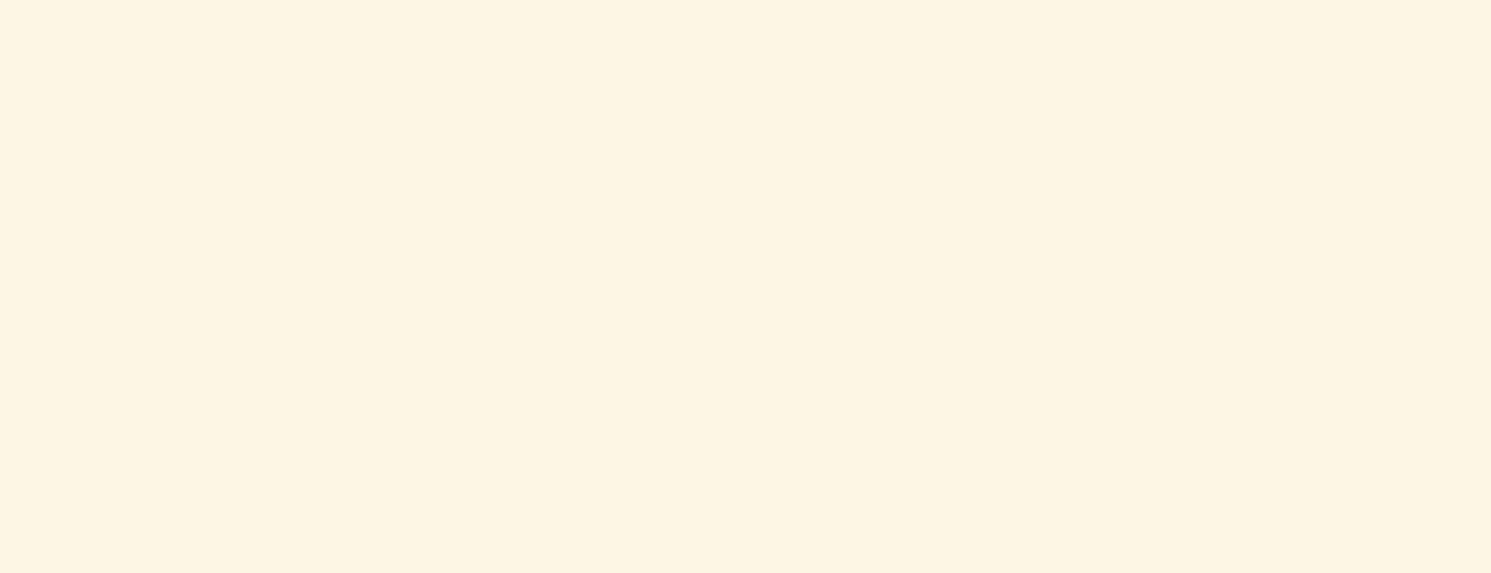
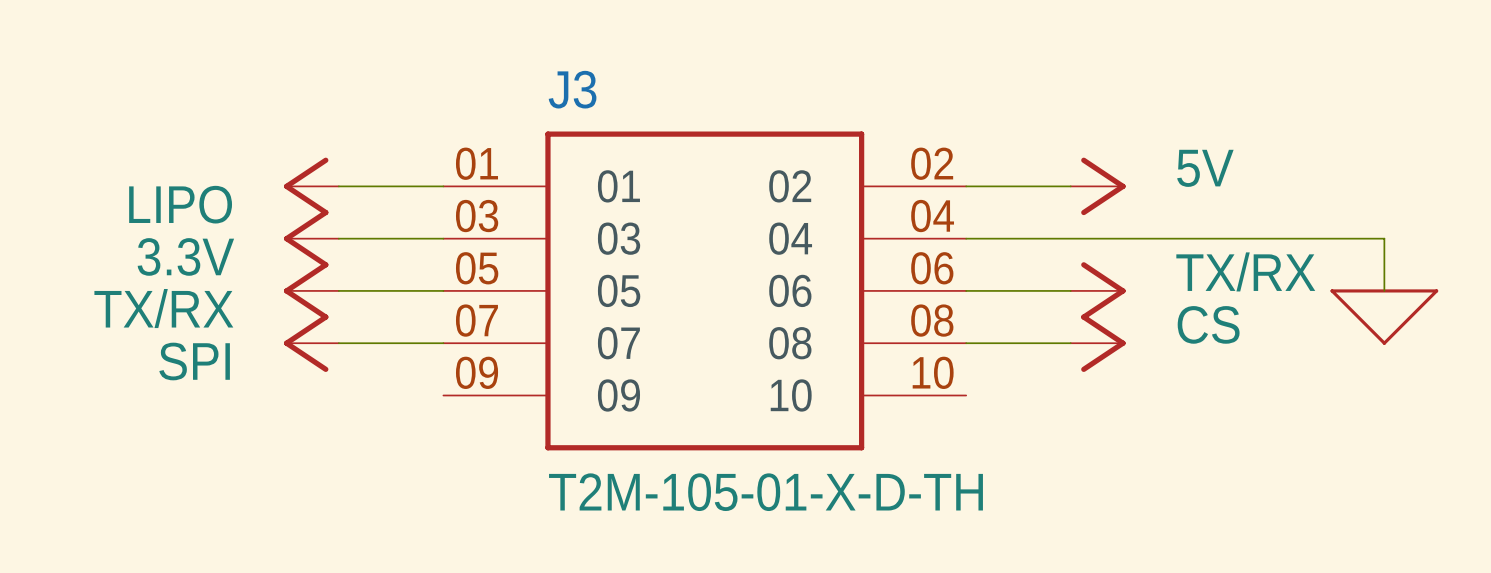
power symbol: none -> LIPO (311, 186)
wire: none -> (338, 186) (443, 186)
wire: none -> (966, 186) (1070, 186)
power symbol: none -> 5V (1098, 186)
power symbol: none -> 3.3V (311, 238)
wire: none -> (338, 238) (443, 238)
wire: none -> (966, 238) (1384, 238) (1384, 290)
power symbol: none -> TX/RX (311, 290)
wire: none -> (338, 290) (443, 290)
J3: none -> T2M-105-01-X-D-TH (704, 290)
wire: none -> (966, 290) (1070, 290)
power symbol: none -> TX/RX (1098, 290)
power symbol: none -> (1384, 317)
power symbol: none -> SPI (311, 343)
wire: none -> (338, 343) (443, 343)
wire: none -> (966, 343) (1070, 343)
power symbol: none -> CS (1098, 343)

